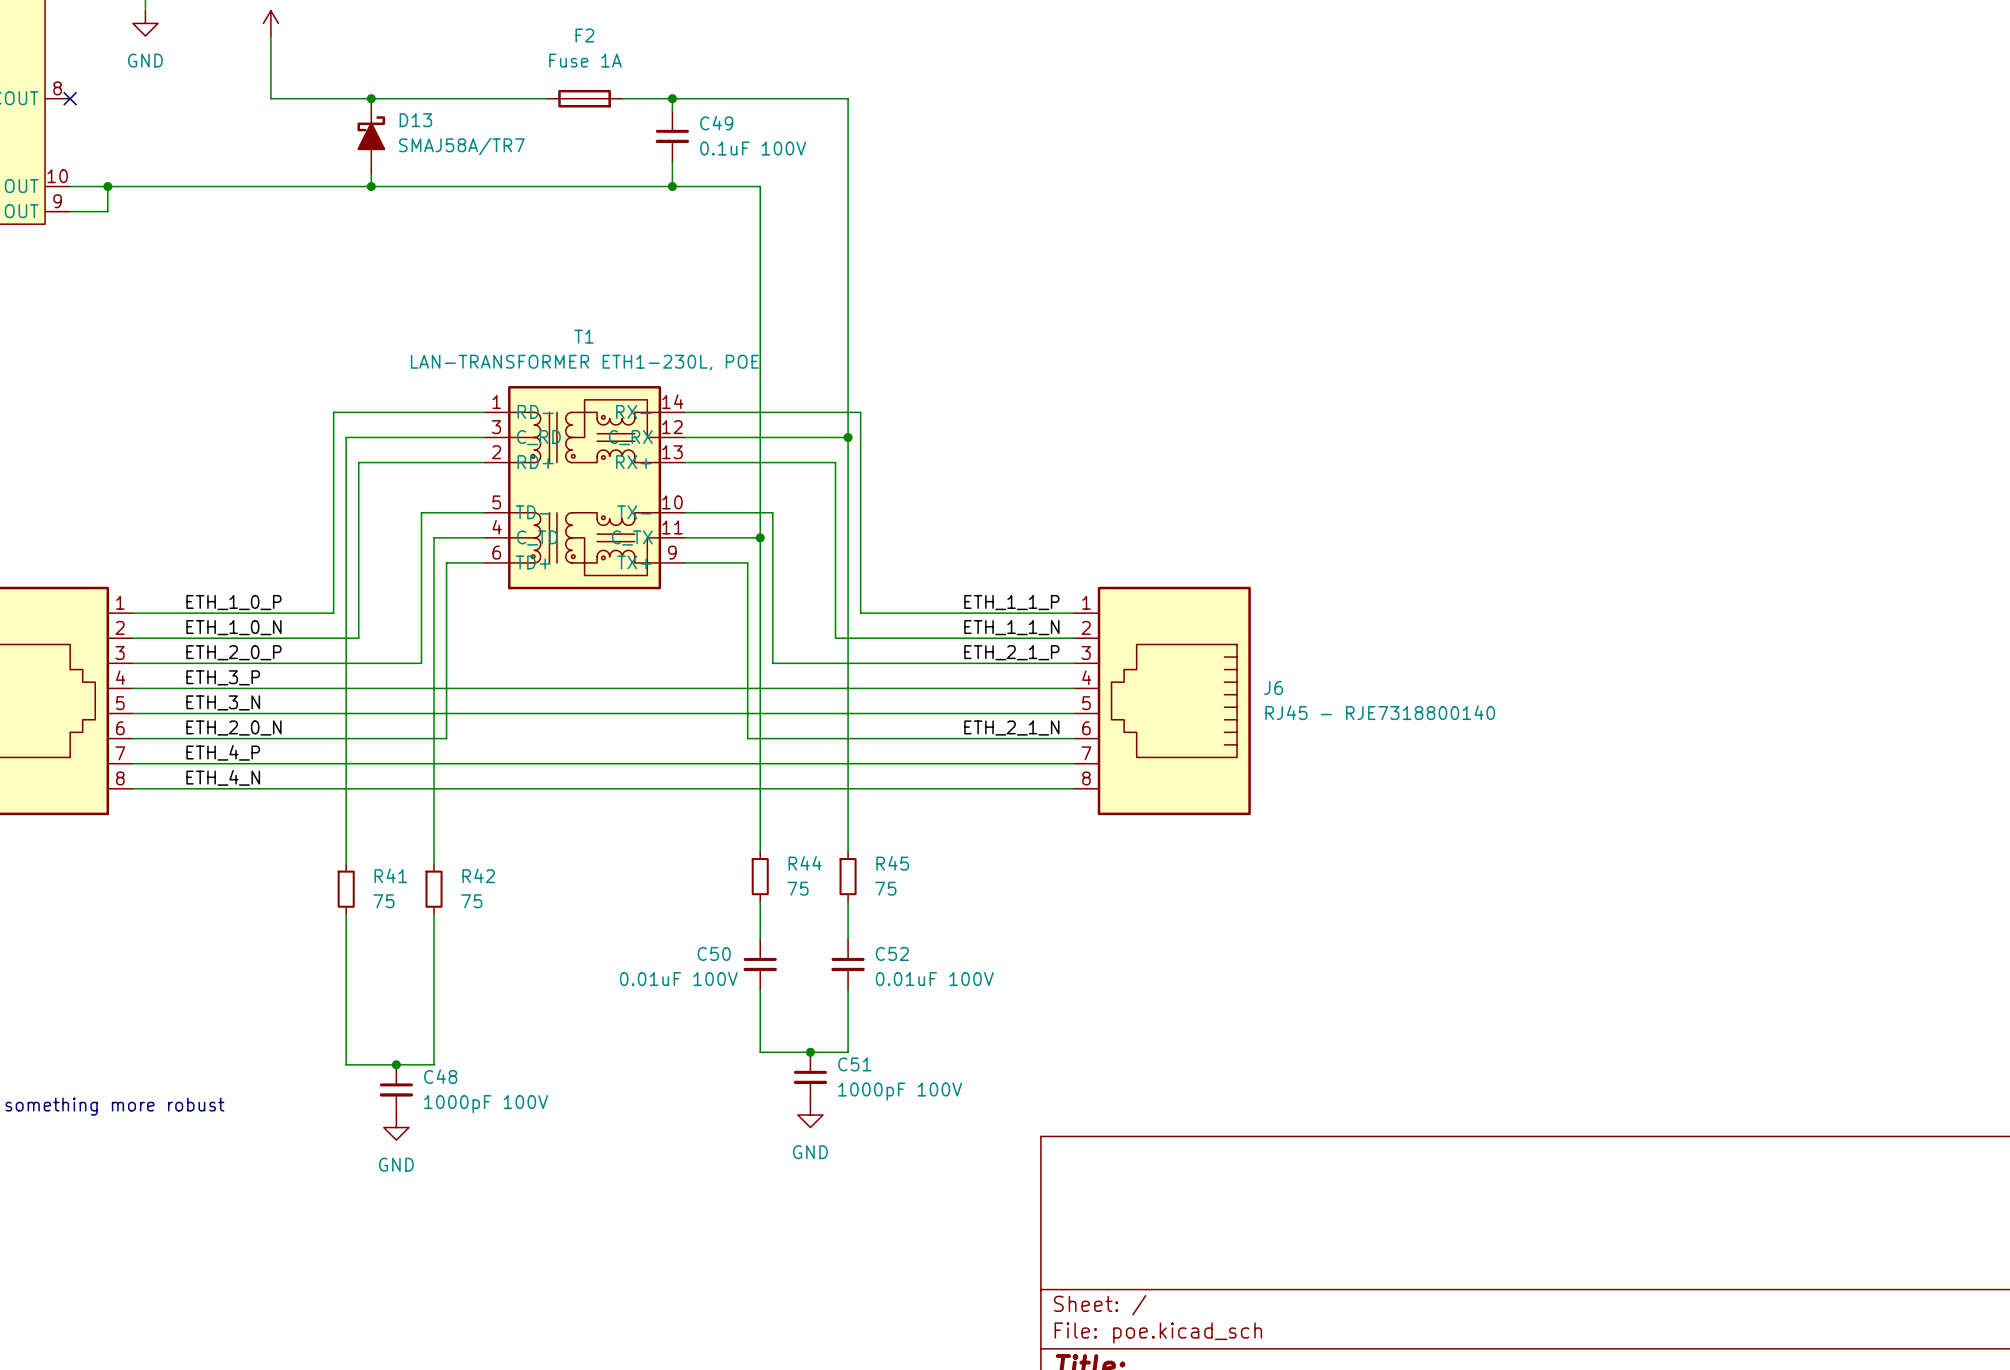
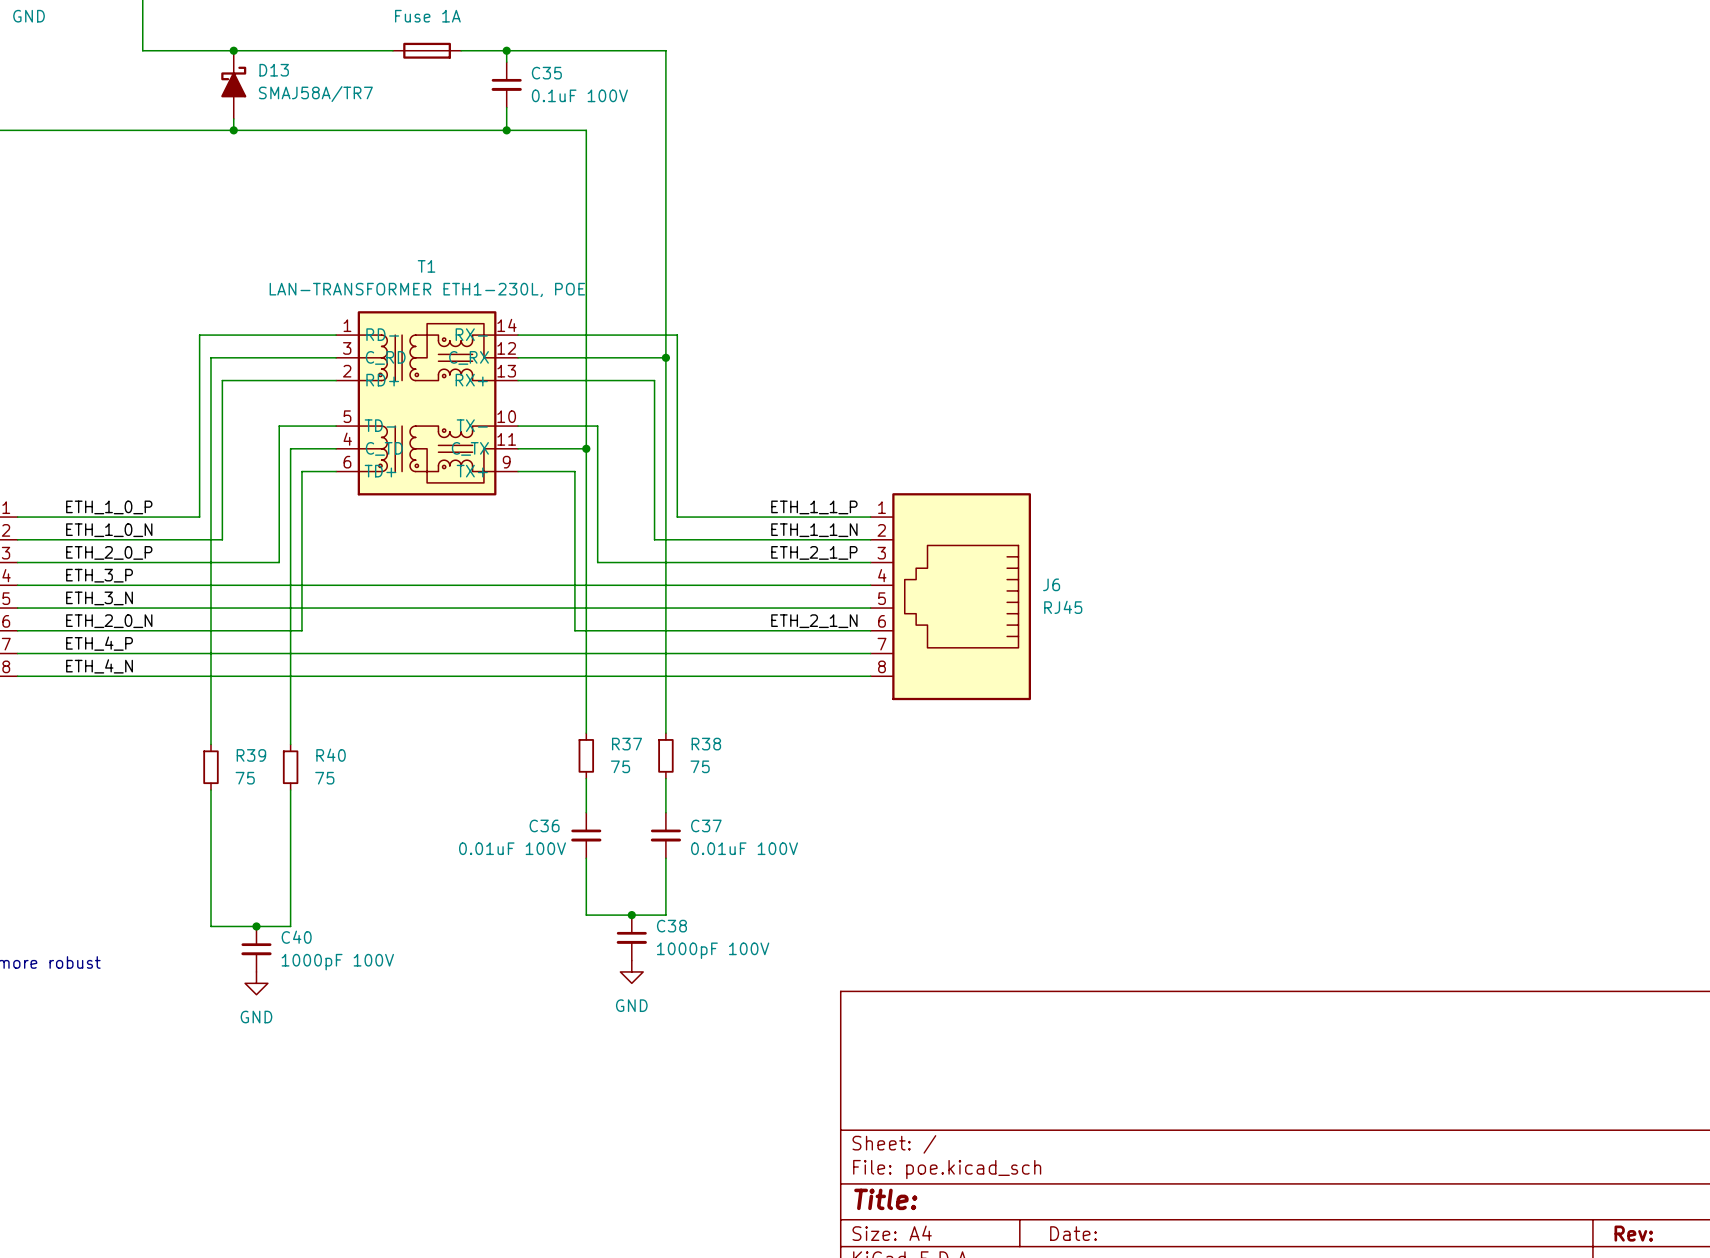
C49 name: C49 (716, 123) -> C35 (546, 73)
J6 value: RJ45 - RJE7318800140 (1380, 712) -> RJ45 (1063, 607)
R44 name: R44 (805, 863) -> R37 (627, 744)
R45 name: R45 (892, 863) -> R38 (706, 744)
R41 name: R41 (390, 875) -> R39 (251, 755)
R42 name: R42 (478, 875) -> R40 (331, 755)
C50 name: C50 (714, 953) -> C36 (544, 825)
C52 name: C52 (892, 953) -> C37 (706, 825)
C51 name: C51 (854, 1064) -> C38 (671, 926)
C48 name: C48 (440, 1076) -> C40 (296, 937)

